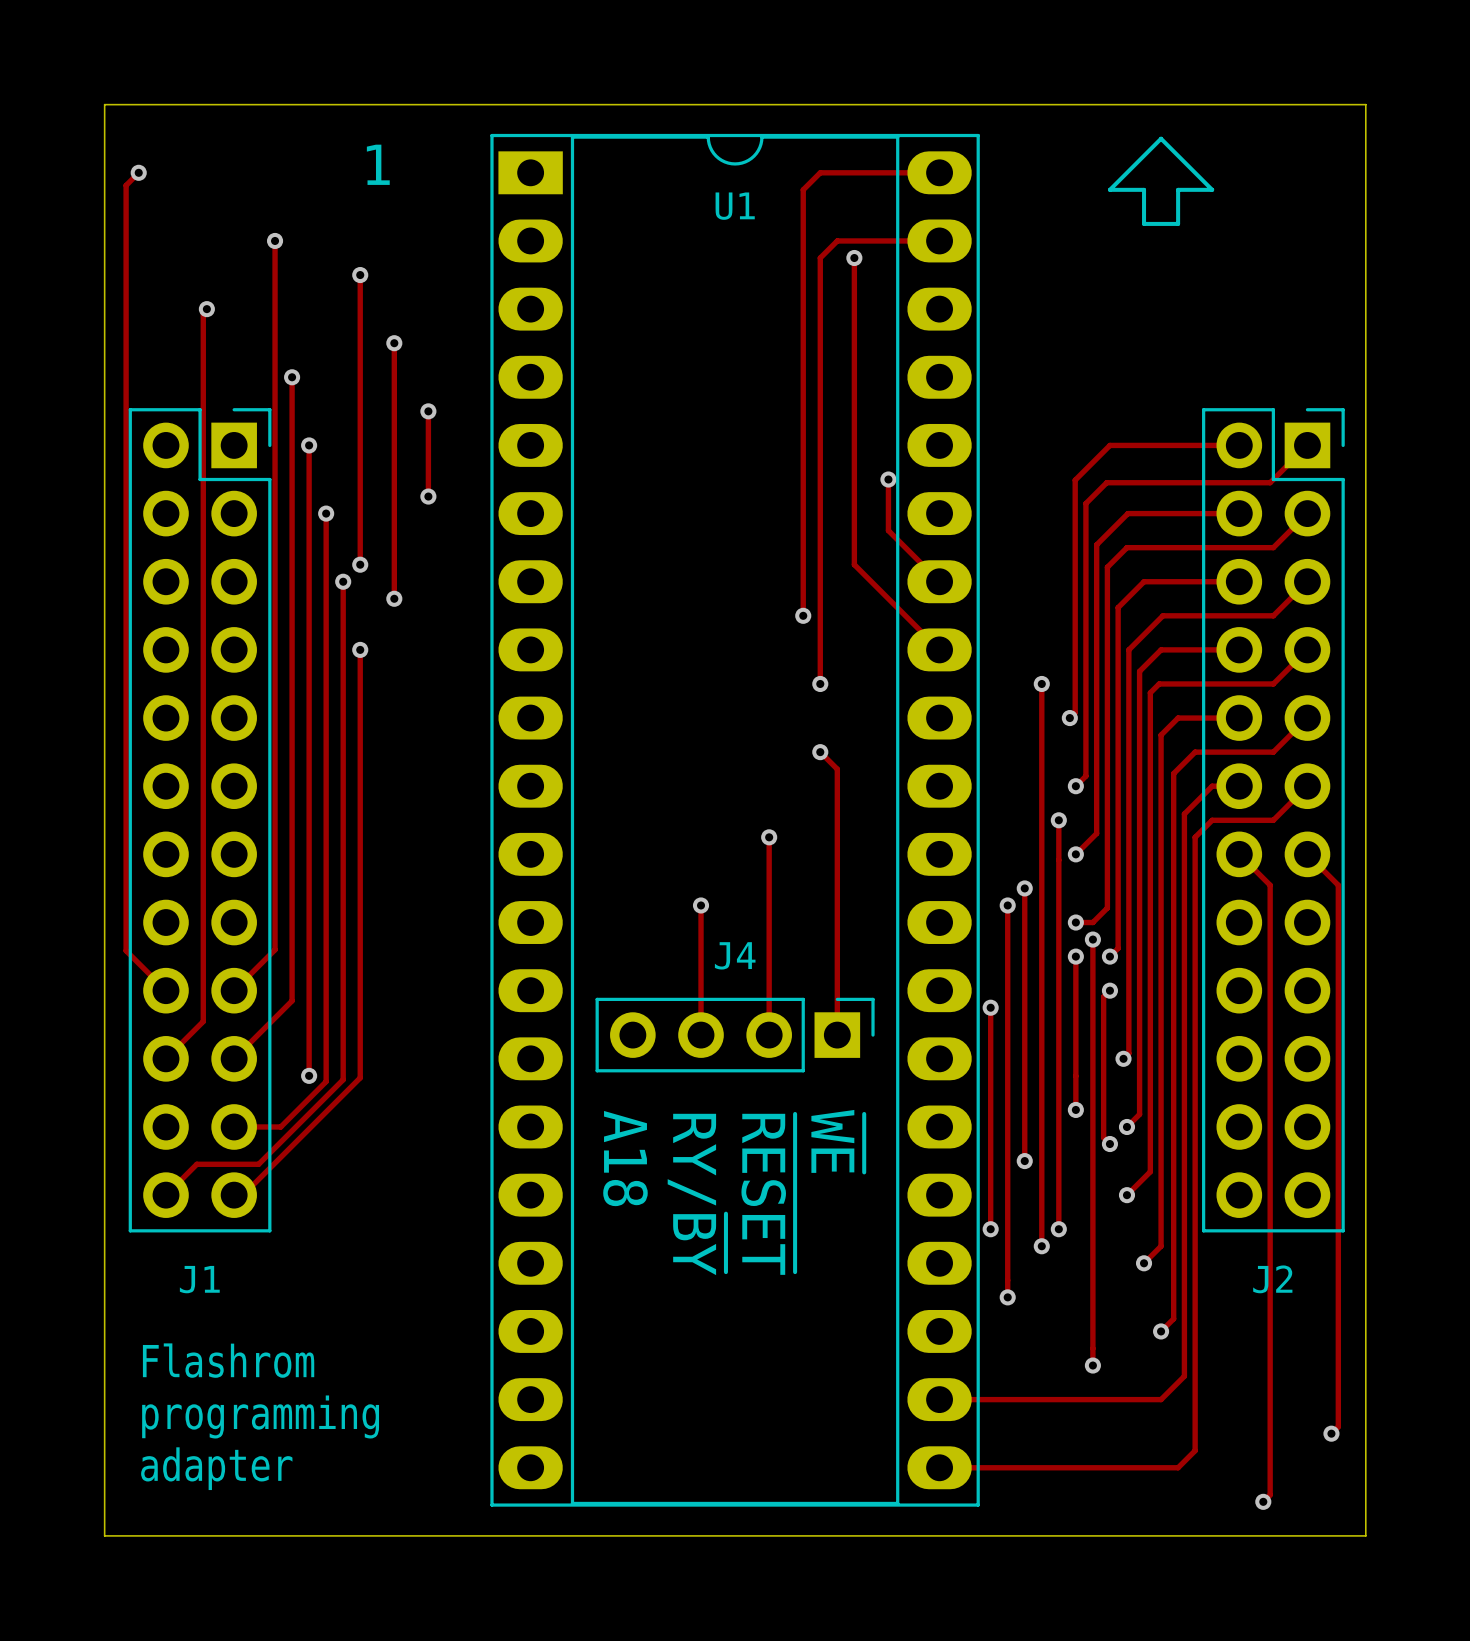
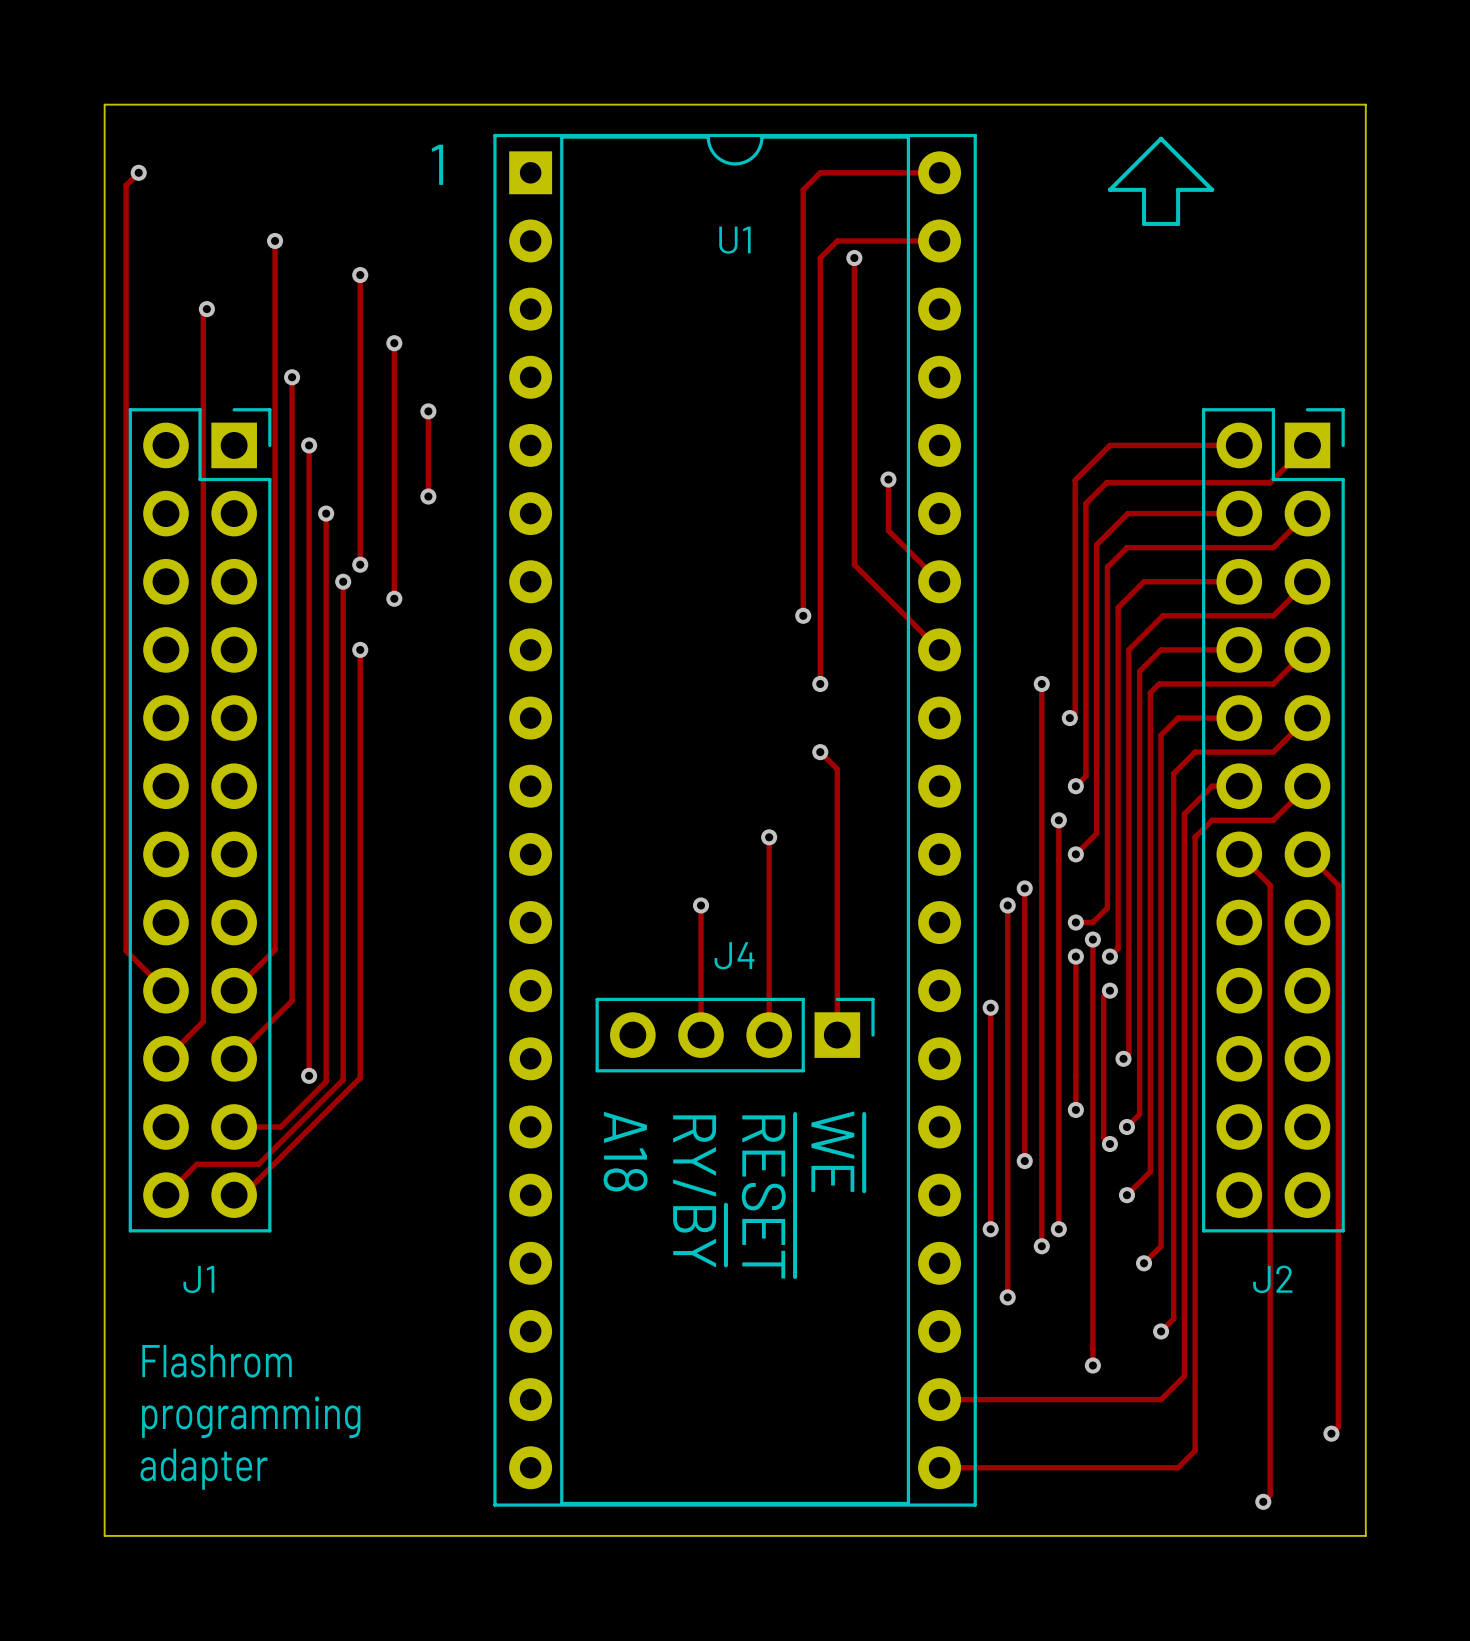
U1 footprint: [490, 133, 980, 1507] -> [493, 133, 977, 1507]
text position: 1 (378, 164) -> 1 (437, 164)

